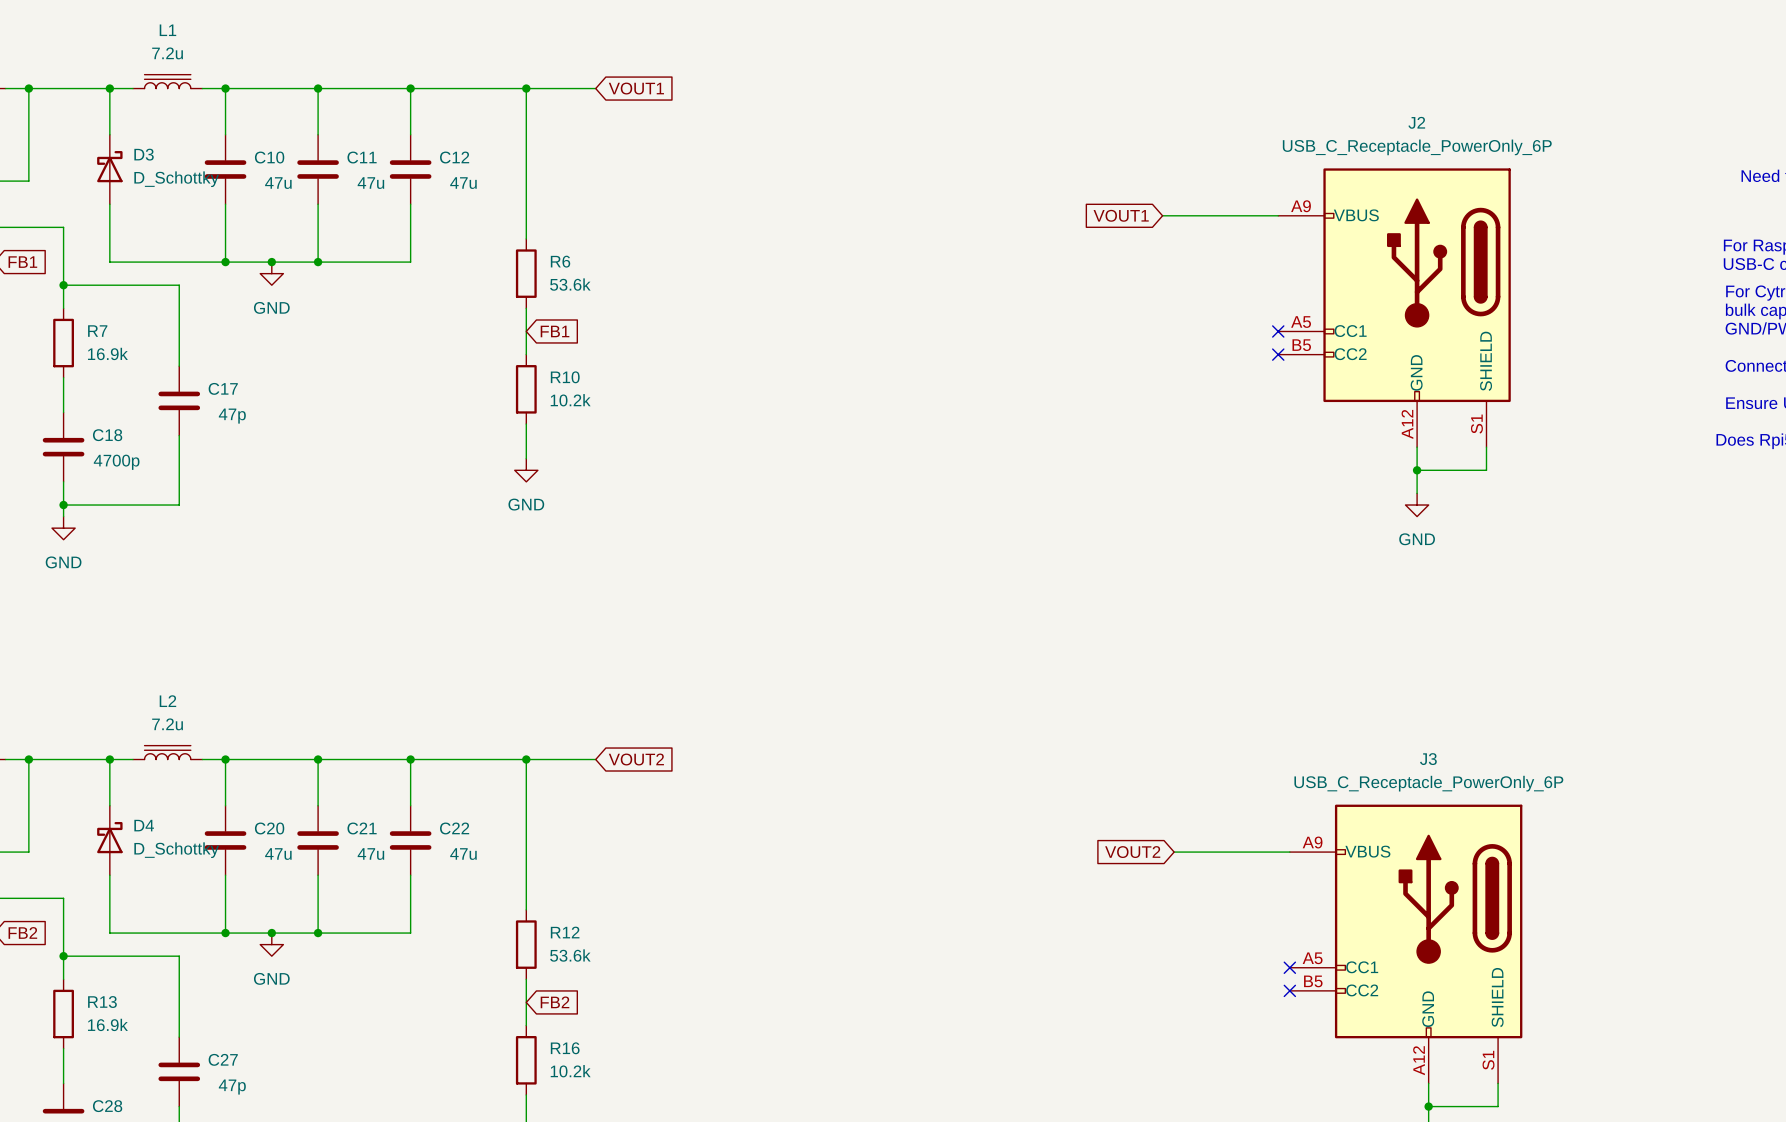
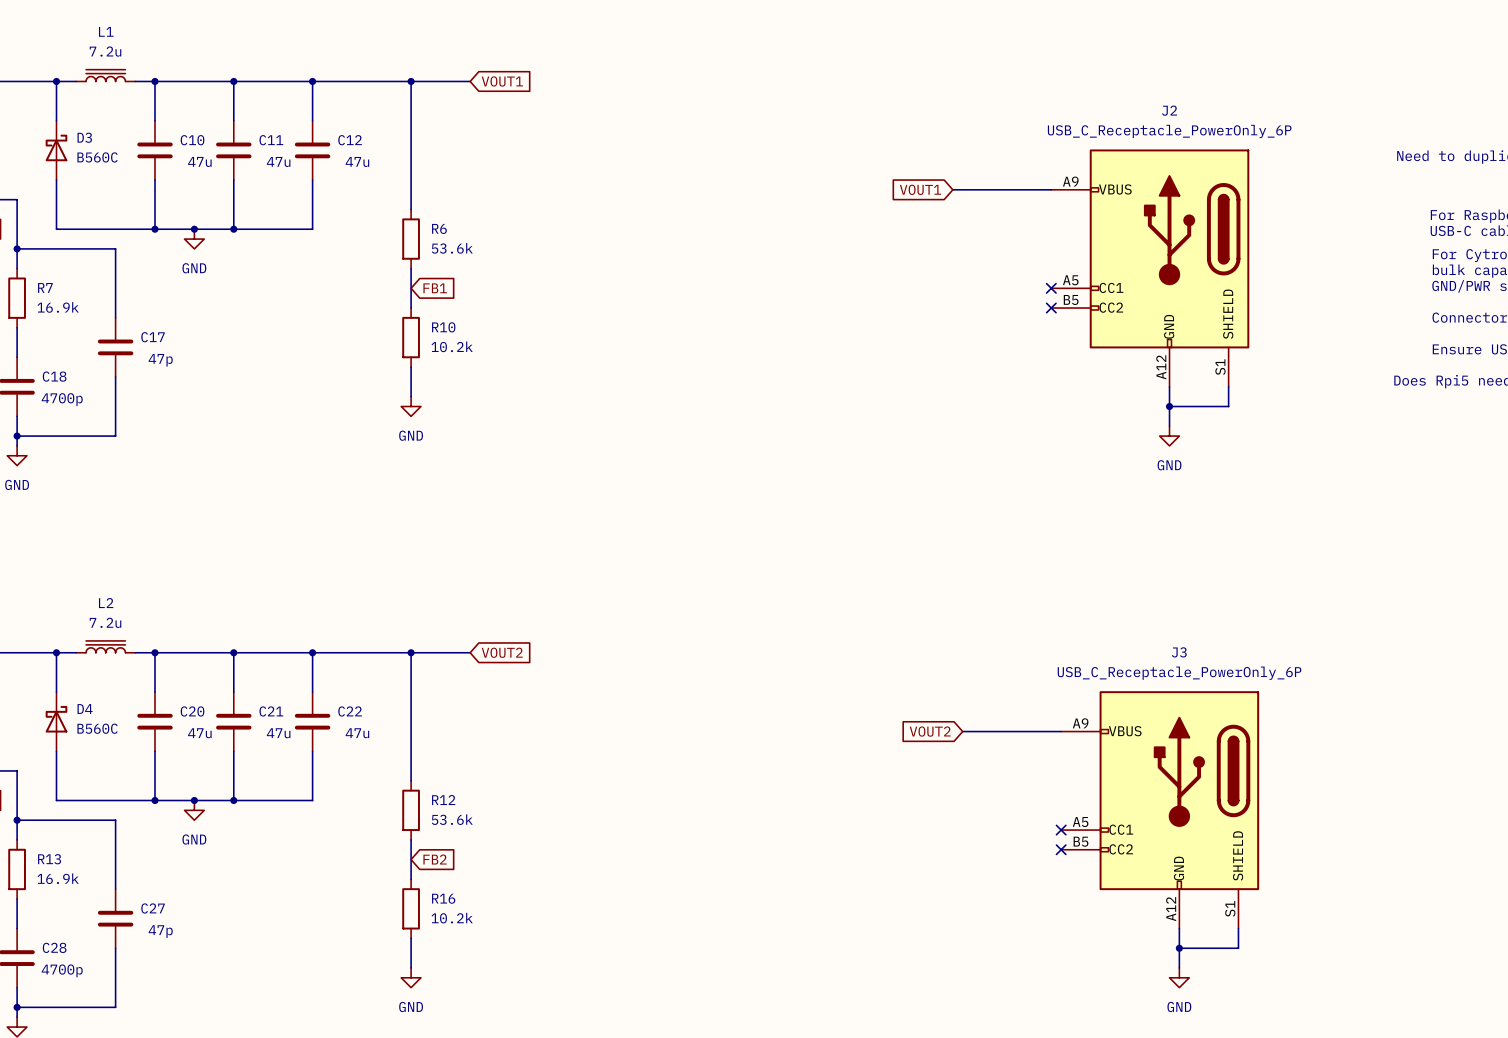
D3 value: D_Schottky (176, 179) -> B560C (97, 157)
D4 value: D_Schottky (176, 850) -> B560C (97, 728)

